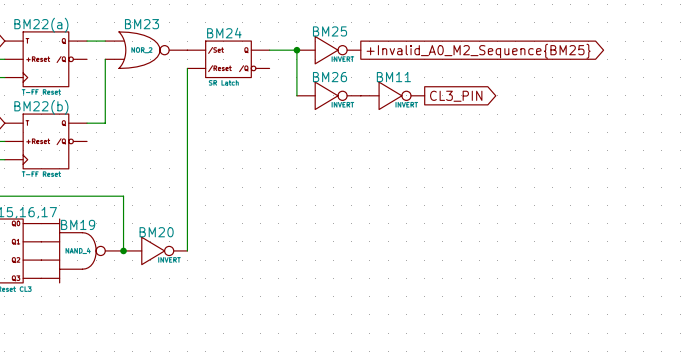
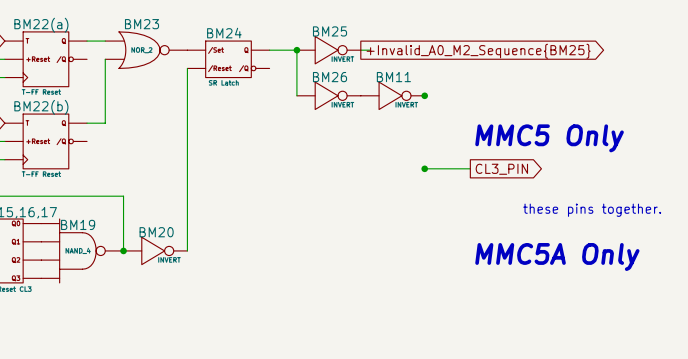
wire: none -> (360, 50) (369, 50)
junction: none -> (424, 95)
global label position: CL3_PIN (456, 96) -> CL3_PIN (501, 169)
text: none -> MMC5 Only (549, 138)
wire: none -> (424, 168) (470, 168)
junction: none -> (424, 168)
text: none -> these pins together. (592, 210)
text: none -> MMC5A Only (557, 256)

